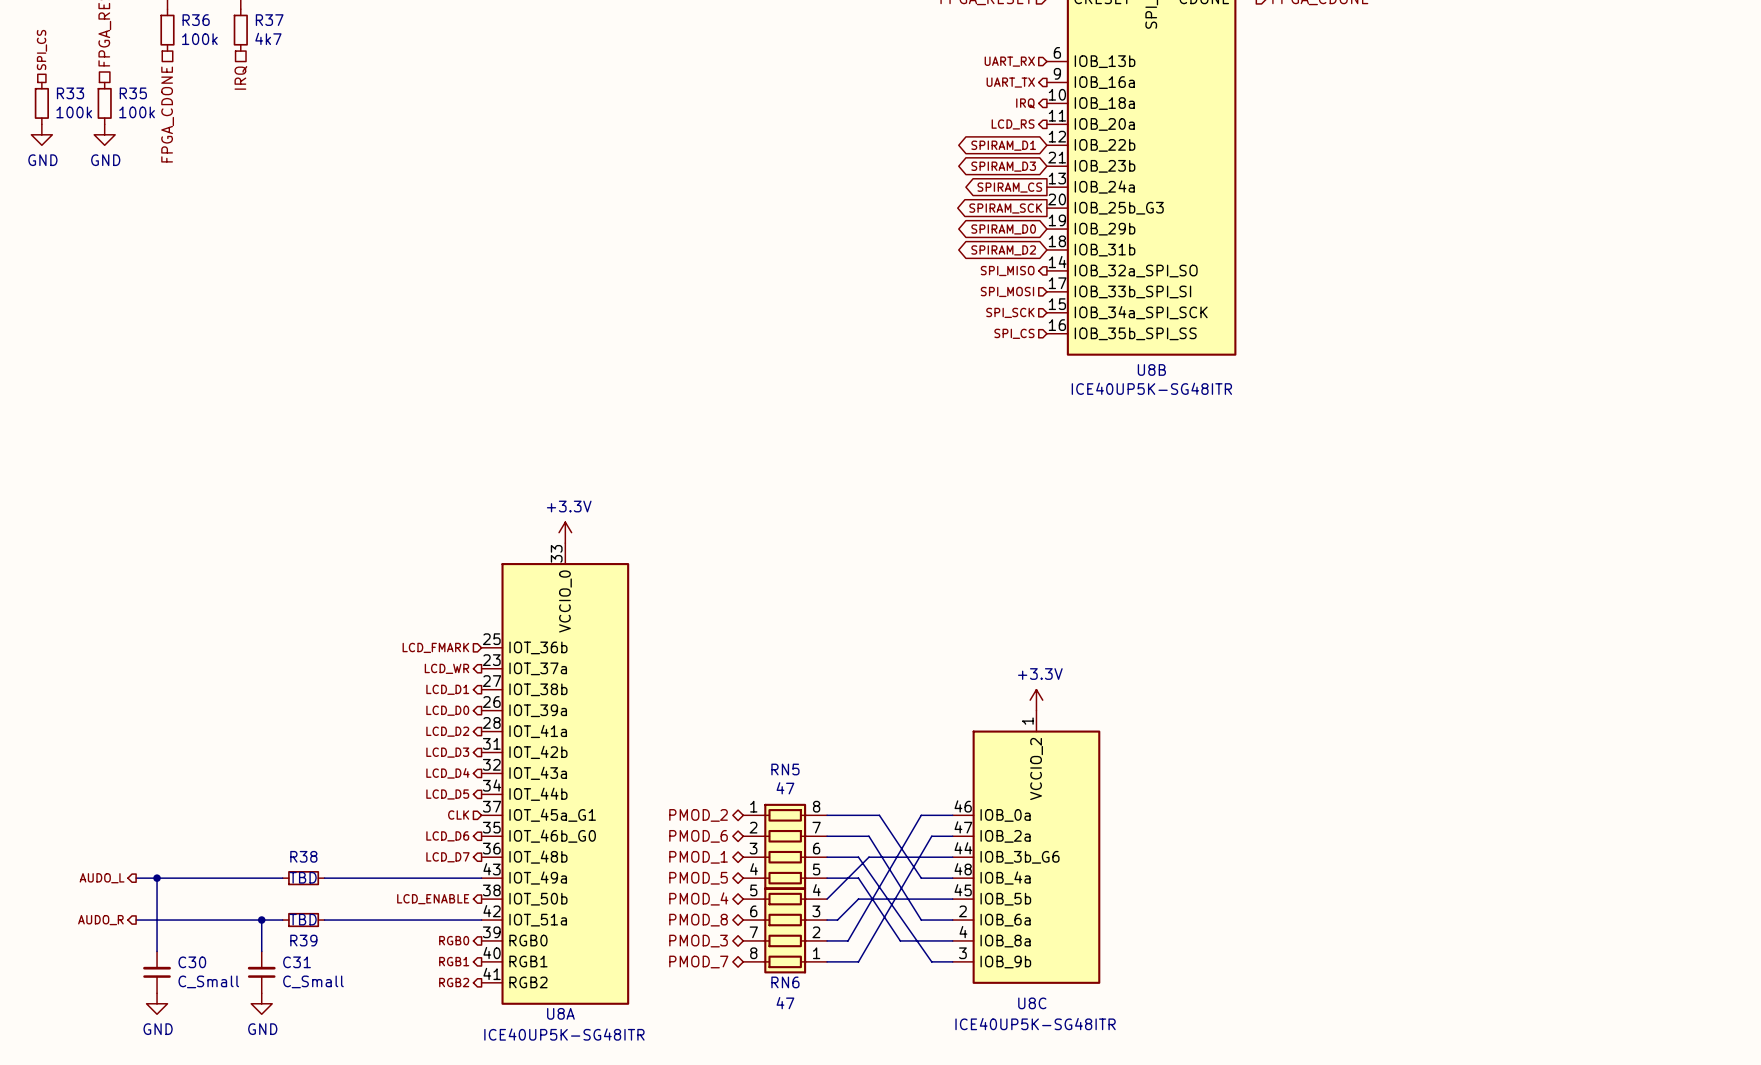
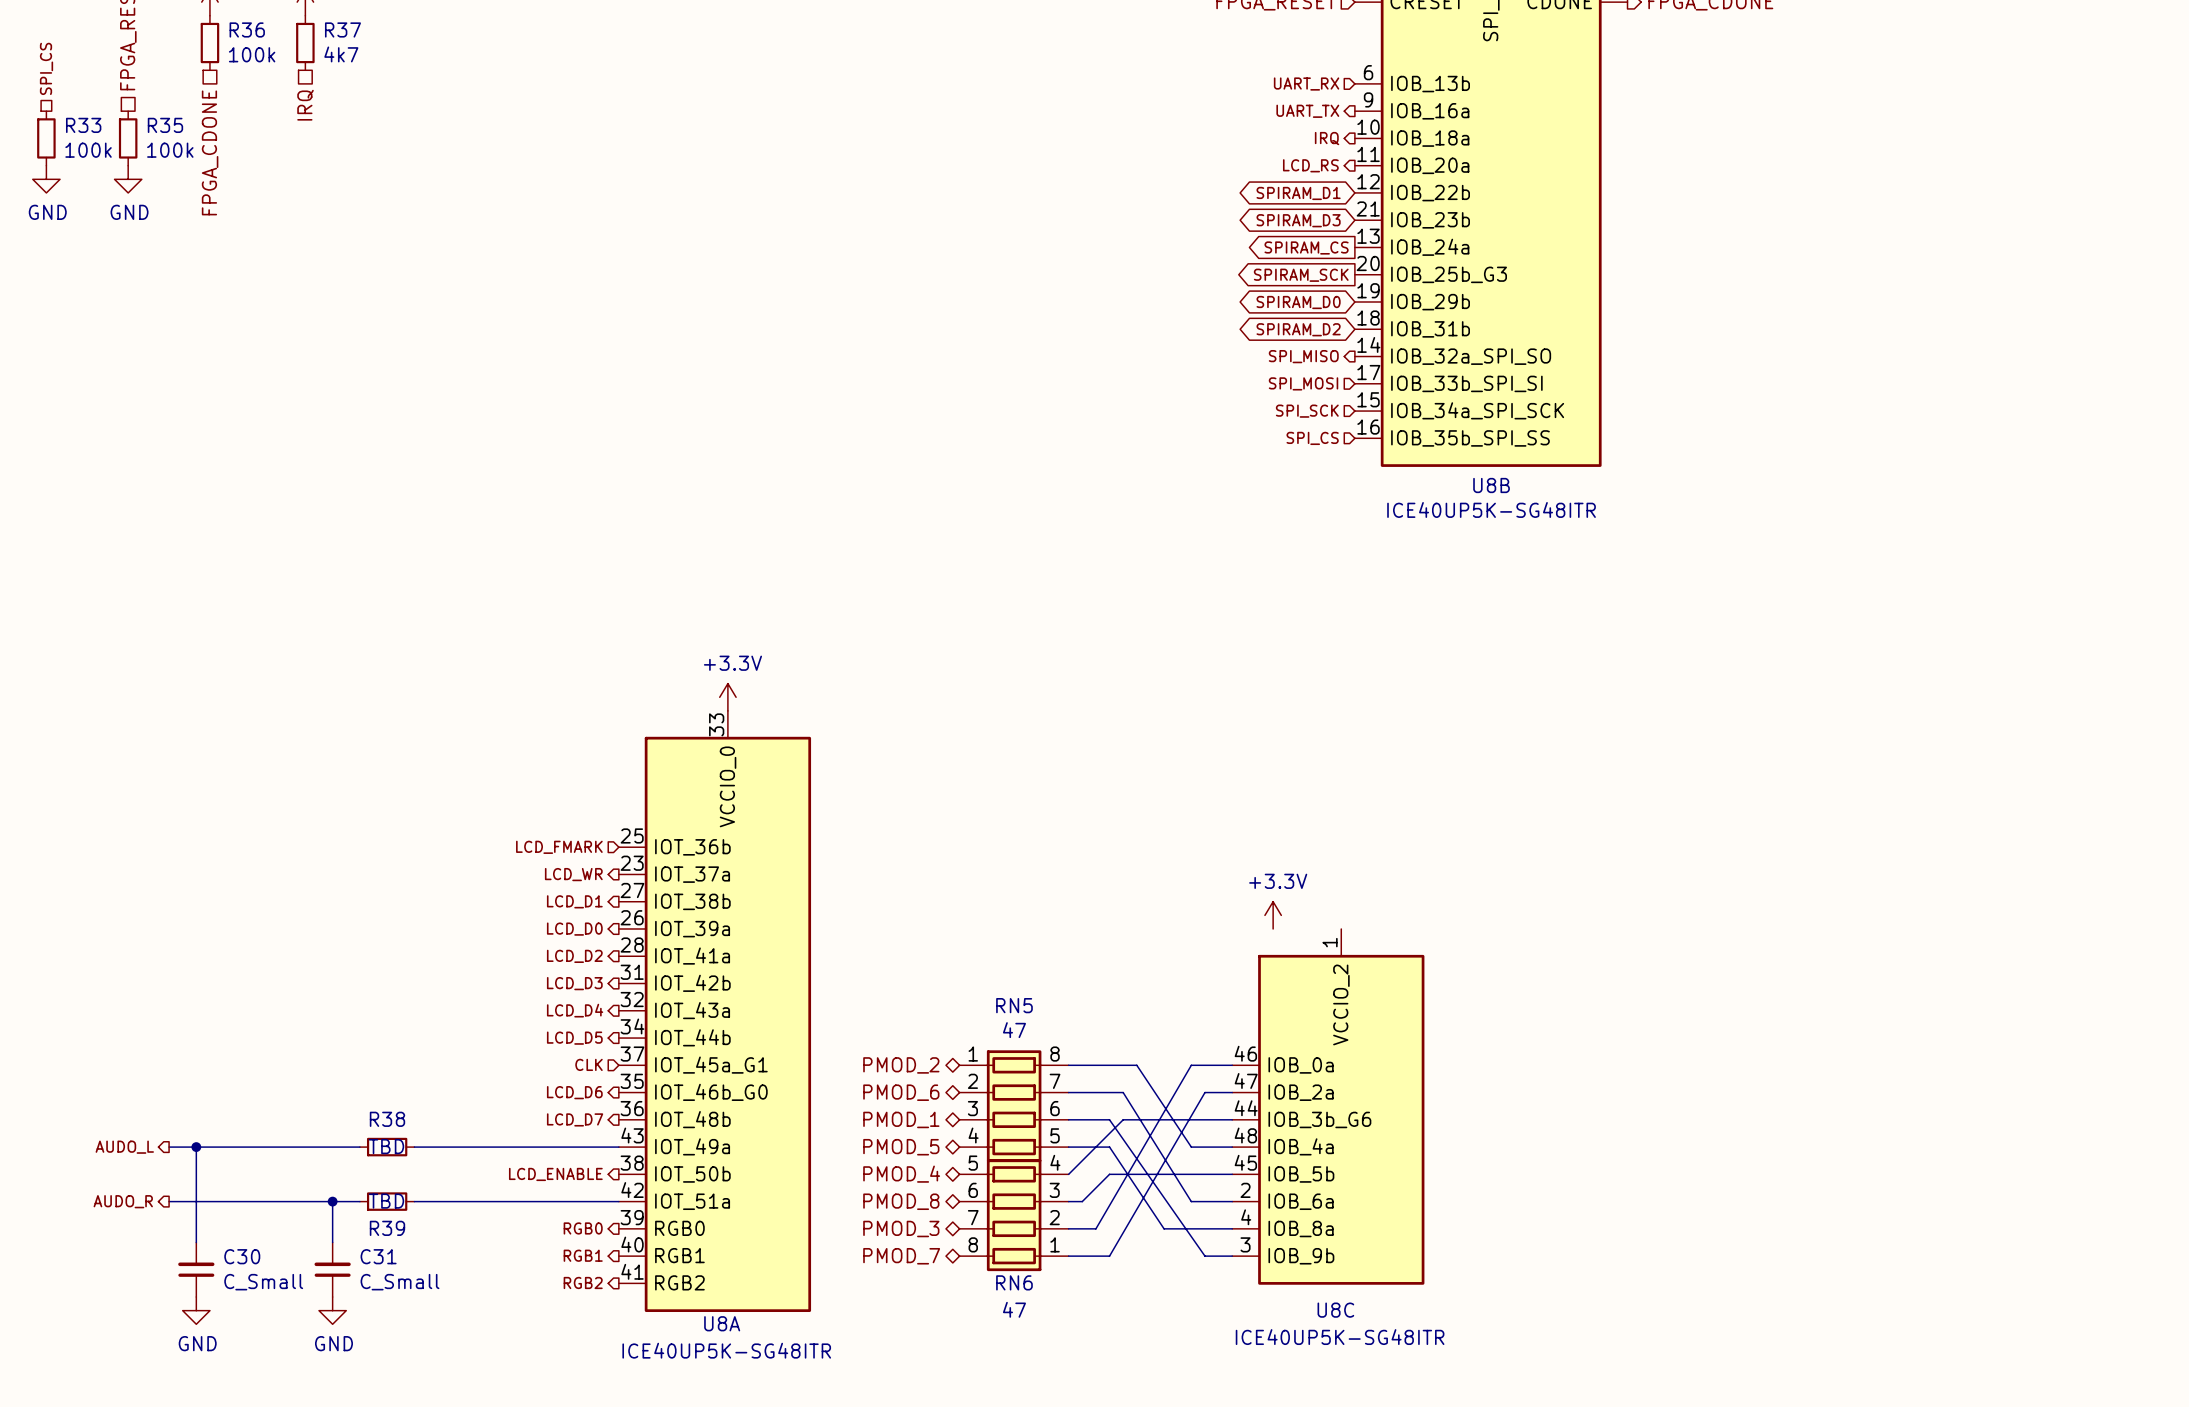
power symbol position: +3.3V (1036, 700) -> +3.3V (1273, 915)

